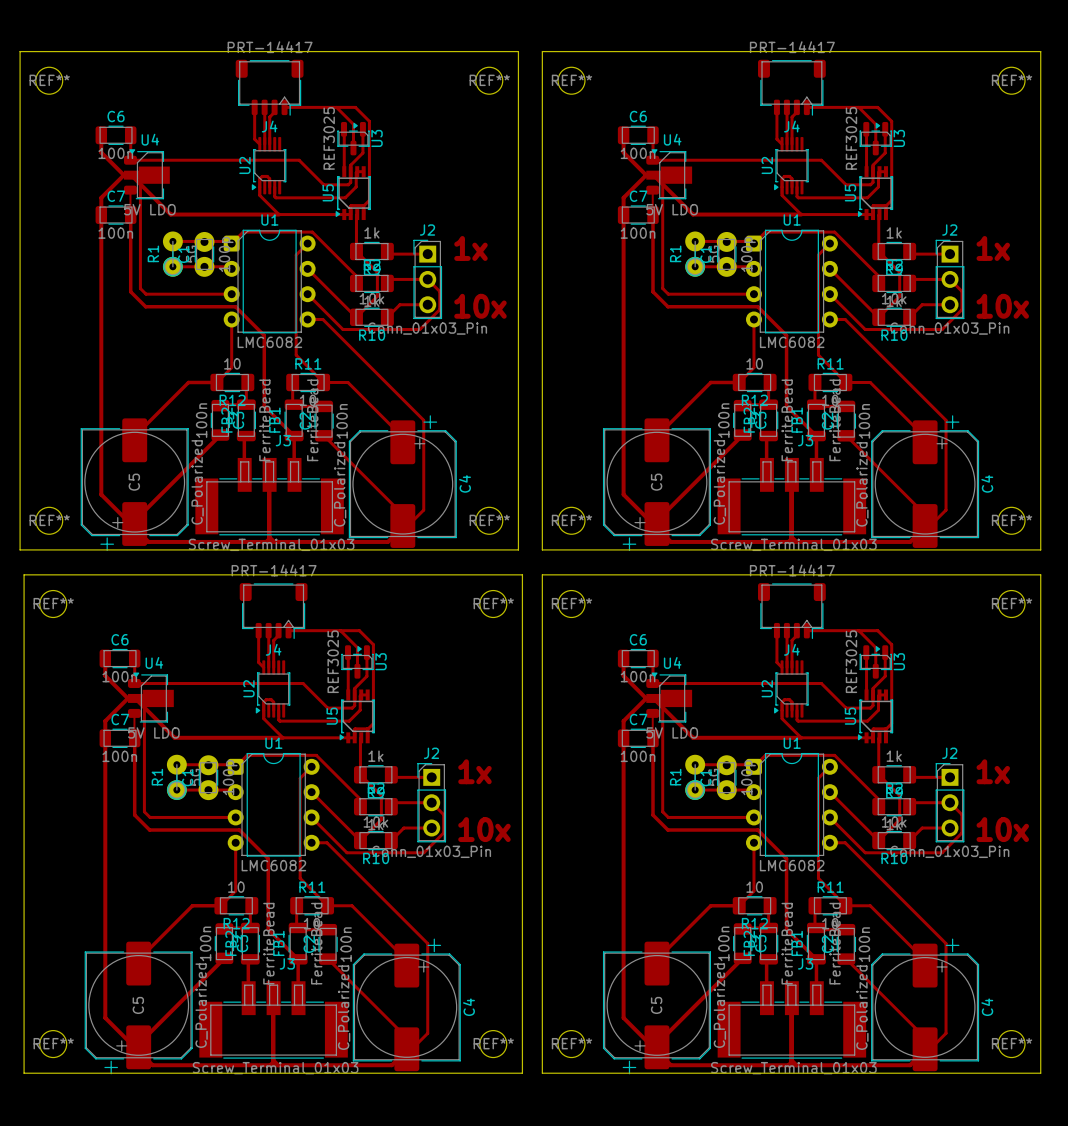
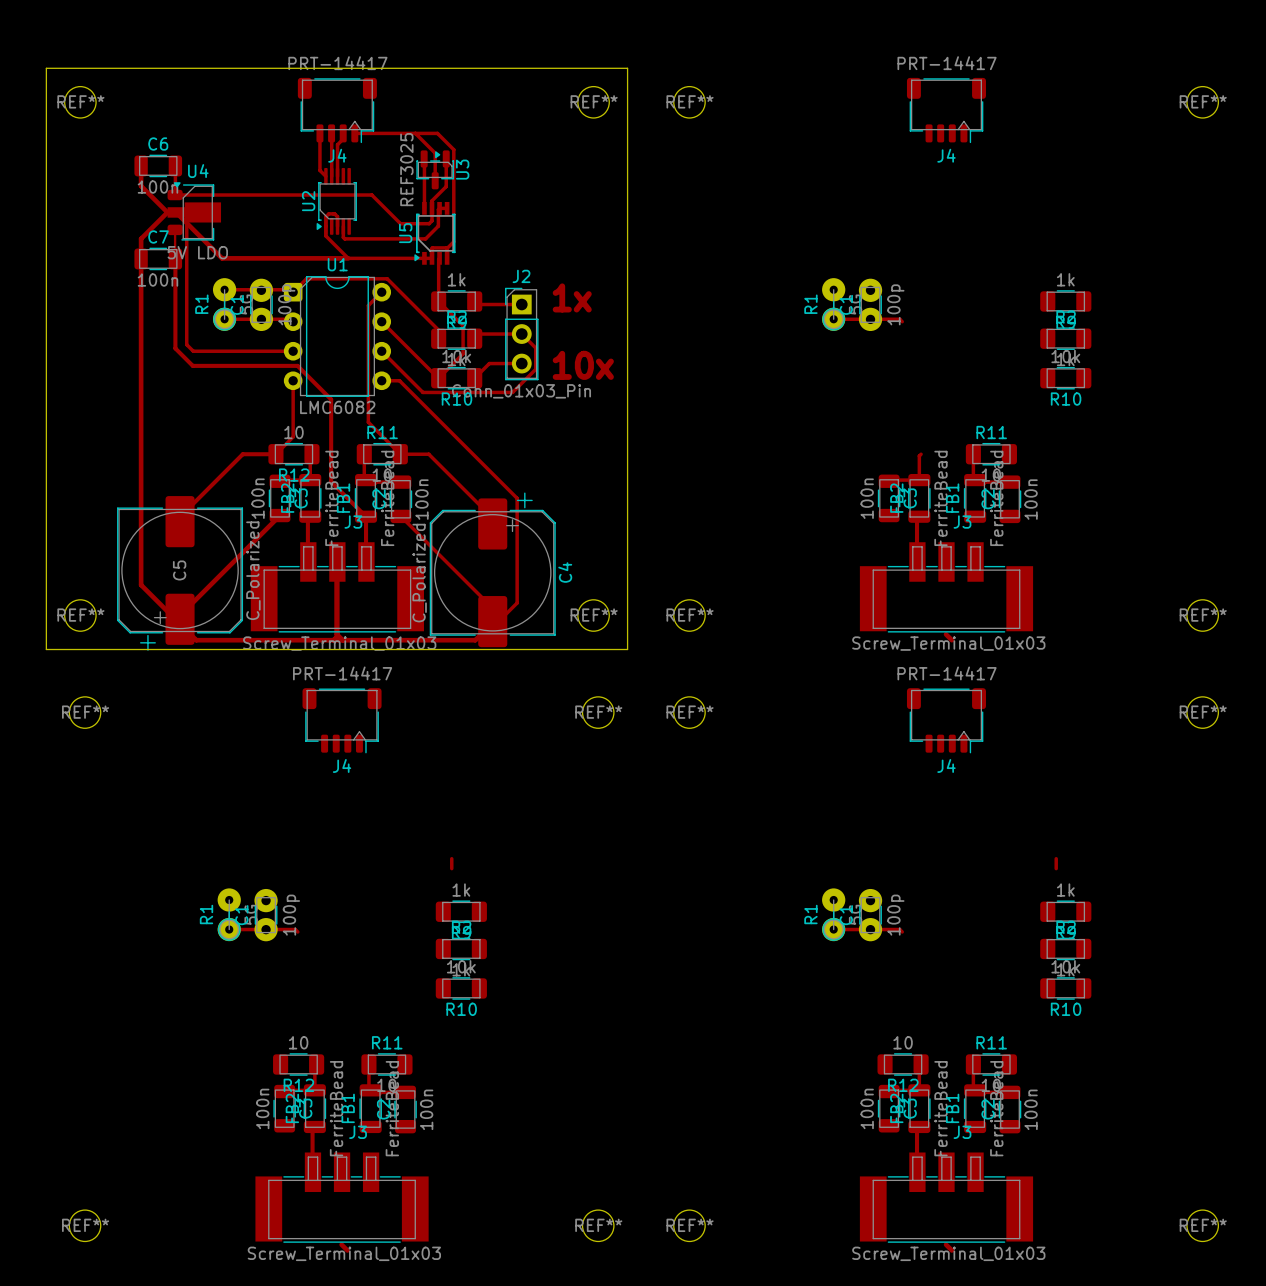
board edge: (542, 51) (1040, 51) (1040, 549) (542, 549) (542, 51) -> none
track: (776, 107) (776, 139) (782, 144) -> none
track: (787, 107) (787, 144) -> none
track: (796, 107) (796, 112) (792, 117) (792, 144) -> none
track: (806, 107) (877, 107) (891, 121) (891, 200) (885, 206) -> none
track: (858, 107) (875, 124) (875, 148) -> none
track: (866, 129) (866, 171) -> none
track: (885, 129) (885, 152) (873, 165) (873, 182) (870, 184) (846, 184) (821, 160) (652, 160) (652, 135) -> none
track: (623, 135) (623, 152) (646, 175) -> none
C6: 100n (638, 135) -> none
U3: REF3025 (875, 138) -> none
U2: (791, 165) -> none
track: (885, 171) (878, 172) (878, 186) (867, 197) (798, 197) (797, 187) -> none
U4: 5V LDO (669, 174) -> none
track: (646, 175) (623, 197) (623, 494) (652, 524) (656, 524) -> none
track: (653, 175) (692, 214) (801, 214) -> none
track: (653, 175) (662, 184) (662, 288) (668, 294) (753, 294) -> none
track: (792, 187) (792, 178) (789, 176) (784, 176) (782, 178) (782, 195) (801, 214) -> none
track: (652, 190) (652, 291) (667, 306) (757, 306) (786, 335) (786, 406) (816, 436) (816, 474) -> none
U5: (875, 193) -> none
track: (885, 206) (873, 205) (873, 214) (801, 214) -> none
track: (879, 214) (878, 251) (899, 272) (899, 296) (878, 317) (829, 268) -> none
C7: 100n (638, 215) -> none
track: (695, 241) (751, 241) (753, 243) (765, 232) (834, 232) (878, 276) (878, 283) -> none
track: (829, 243) (818, 255) (818, 355) (845, 382) (870, 382) (925, 437) (925, 442) -> none
text: 1x (993, 248) -> none
track: (909, 251) (912, 254) (950, 254) -> none
J2: Conn_01x03_Pin (950, 279) -> none
U1: LMC6082 (791, 281) -> none
track: (909, 283) (913, 279) (950, 279) (961, 291) (961, 309) (942, 329) (865, 329) (829, 294) -> none
track: (950, 304) (922, 304) (909, 317) -> none
text: 10x (1002, 306) -> none
track: (753, 319) (753, 367) (739, 382) -> none
track: (829, 319) (845, 319) (946, 420) (946, 510) (930, 526) (925, 526) (930, 519) (846, 435) -> none
track: (739, 382) (710, 382) (656, 436) (656, 440) -> none
R12: 10 (754, 382) -> none
track: (742, 435) (656, 520) (656, 528) (670, 541) (910, 541) (928, 524) -> none
track: (791, 474) (791, 538) (788, 541) -> none
C4: C_Polarized (925, 481) -> none
C5: C_Polarized (656, 484) -> none
board edge: (24, 574) (522, 574) (522, 1073) (24, 1073) (24, 574) -> none
board edge: (542, 574) (1040, 574) (1040, 1073) (542, 1073) (542, 574) -> none
track: (258, 630) (258, 662) (263, 667) -> none
track: (268, 630) (268, 667) -> none
track: (278, 630) (278, 635) (273, 640) (273, 667) -> none
track: (288, 630) (359, 630) (373, 644) (373, 723) (367, 729) (355, 728) (354, 737) (282, 737) -> none
track: (340, 630) (357, 647) (357, 671) -> none
track: (776, 630) (776, 662) (782, 667) -> none
track: (787, 630) (787, 667) -> none
track: (796, 630) (796, 635) (792, 640) (792, 667) -> none
track: (806, 630) (877, 630) (891, 644) (891, 723) (885, 729) (873, 728) (873, 737) (801, 737) -> none
track: (858, 630) (875, 647) (875, 671) -> none
track: (348, 652) (348, 694) -> none
track: (366, 652) (366, 676) (354, 688) (354, 705) (352, 708) (327, 708) (303, 683) (134, 683) (134, 658) -> none
track: (866, 652) (866, 694) -> none
track: (885, 652) (885, 676) (873, 688) (873, 705) (870, 708) (846, 708) (821, 683) (652, 683) (652, 658) -> none
track: (105, 658) (105, 675) (127, 698) -> none
C6: 100n (120, 658) -> none
track: (623, 658) (623, 675) (646, 698) -> none
C6: 100n (638, 658) -> none
U3: REF3025 (357, 661) -> none
U3: REF3025 (875, 661) -> none
U2: (273, 688) -> none
U2: (791, 688) -> none
track: (367, 694) (360, 695) (360, 710) (349, 721) (279, 721) (278, 710) -> none
track: (885, 694) (878, 695) (878, 710) (867, 721) (798, 721) (797, 710) -> none
U4: 5V LDO (150, 697) -> none
U4: 5V LDO (669, 697) -> none
track: (127, 698) (105, 721) (105, 1017) (134, 1047) (138, 1047) -> none
track: (135, 698) (174, 737) (282, 737) -> none
track: (135, 698) (144, 707) (144, 811) (150, 817) (235, 817) -> none
track: (646, 698) (623, 721) (623, 1017) (652, 1047) (656, 1047) -> none
track: (653, 698) (692, 737) (801, 737) -> none
track: (653, 698) (662, 707) (662, 811) (668, 817) (753, 817) -> none
track: (273, 710) (273, 702) (271, 699) (266, 699) (263, 702) (263, 718) (282, 737) -> none
track: (792, 710) (792, 702) (789, 699) (784, 699) (782, 702) (782, 718) (801, 737) -> none
track: (134, 713) (134, 815) (149, 830) (239, 830) (268, 858) (268, 929) (298, 959) (298, 998) -> none
track: (652, 713) (652, 815) (667, 830) (757, 830) (786, 858) (786, 929) (816, 959) (816, 998) -> none
U5: (357, 716) -> none
U5: (875, 716) -> none
track: (361, 737) (360, 774) (381, 795) (381, 819) (360, 840) (311, 792) -> none
track: (879, 737) (878, 774) (899, 795) (899, 819) (878, 840) (829, 792) -> none
C7: 100n (120, 738) -> none
C7: 100n (638, 738) -> none
track: (176, 764) (233, 764) (235, 766) (247, 755) (316, 755) (360, 799) (360, 806) -> none
track: (695, 764) (751, 764) (753, 766) (765, 755) (834, 755) (878, 799) (878, 806) -> none
track: (311, 766) (300, 778) (300, 878) (327, 905) (351, 905) (406, 960) (406, 965) -> none
track: (829, 766) (818, 778) (818, 878) (845, 905) (870, 905) (925, 960) (925, 965) -> none
text: 1x (474, 771) -> none
text: 1x (993, 771) -> none
track: (391, 774) (393, 777) (431, 777) -> none
track: (909, 774) (912, 777) (950, 777) -> none
J2: Conn_01x03_Pin (431, 802) -> none
J2: Conn_01x03_Pin (950, 802) -> none
U1: LMC6082 (273, 804) -> none
U1: LMC6082 (791, 804) -> none
track: (391, 806) (395, 802) (431, 802) (443, 814) (443, 832) (423, 852) (346, 852) (311, 817) -> none
track: (909, 806) (913, 802) (950, 802) (961, 814) (961, 832) (942, 852) (865, 852) (829, 817) -> none
track: (431, 828) (403, 828) (391, 840) -> none
track: (950, 828) (922, 828) (909, 840) -> none
text: 10x (484, 829) -> none
text: 10x (1002, 829) -> none
track: (235, 842) (235, 891) (220, 905) -> none
track: (311, 842) (326, 842) (427, 943) (427, 1033) (411, 1049) (406, 1049) (411, 1042) (328, 959) -> none
track: (753, 842) (753, 891) (739, 905) -> none
track: (829, 842) (845, 842) (946, 943) (946, 1033) (930, 1049) (925, 1049) (930, 1042) (846, 959) -> none
track: (220, 905) (192, 905) (138, 959) (138, 963) -> none
track: (739, 905) (710, 905) (656, 959) (656, 963) -> none
track: (224, 958) (138, 1044) (138, 1051) (152, 1065) (391, 1065) (409, 1047) -> none
track: (742, 958) (656, 1044) (656, 1051) (670, 1065) (910, 1065) (928, 1047) -> none
track: (273, 998) (273, 1062) (270, 1065) -> none
track: (791, 998) (791, 1062) (788, 1065) -> none
C4: C_Polarized (406, 1004) -> none
C4: C_Polarized (925, 1004) -> none
C5: C_Polarized (138, 1007) -> none
C5: C_Polarized (656, 1007) -> none

